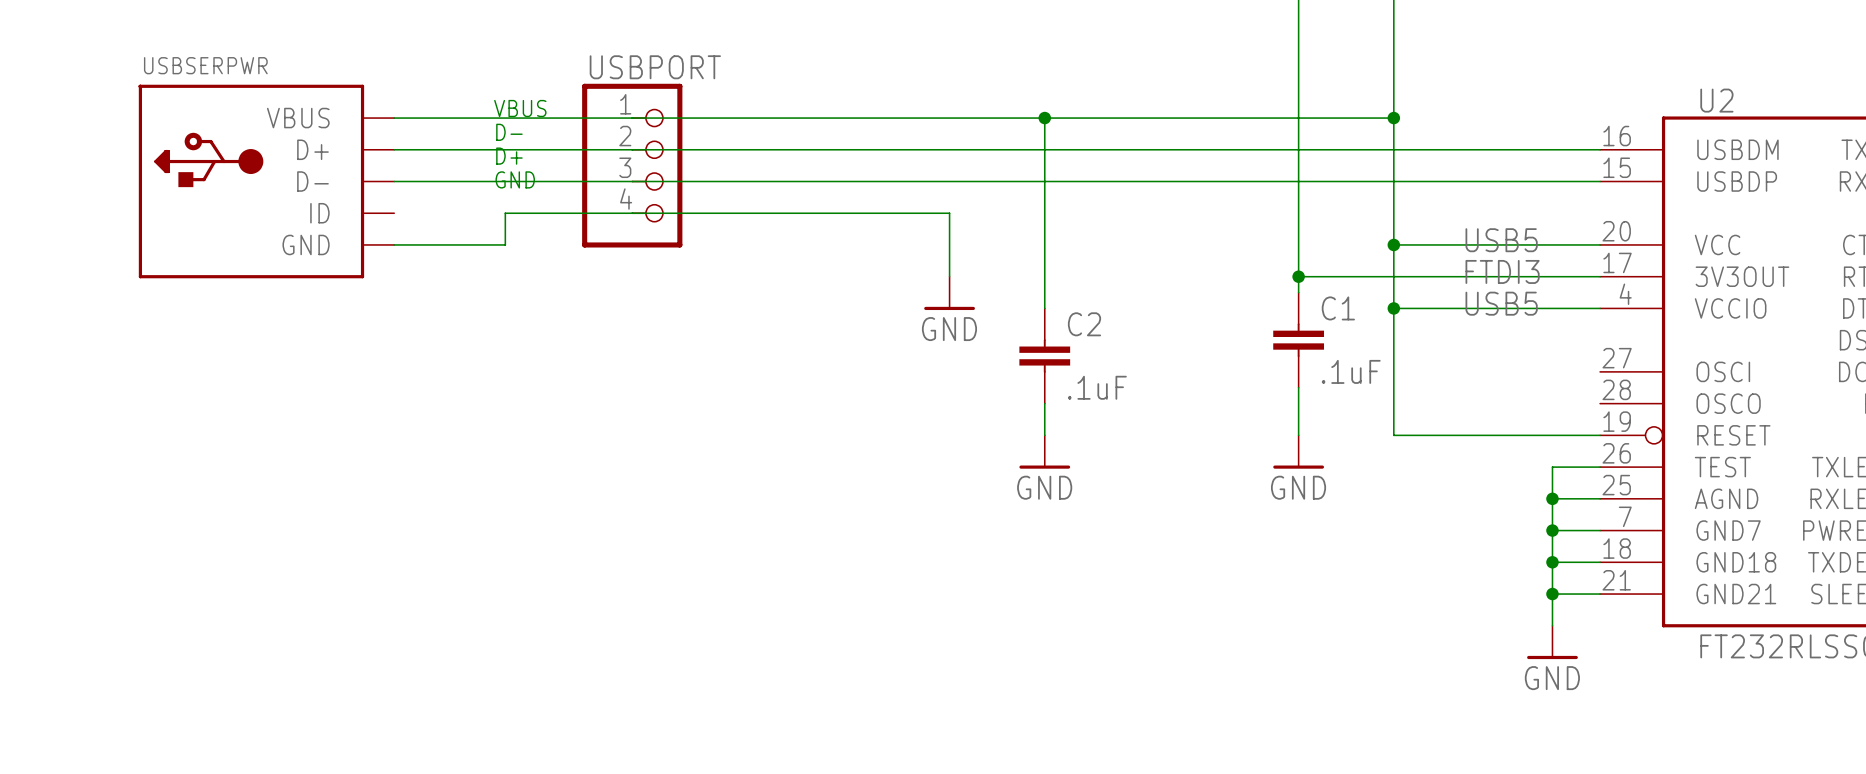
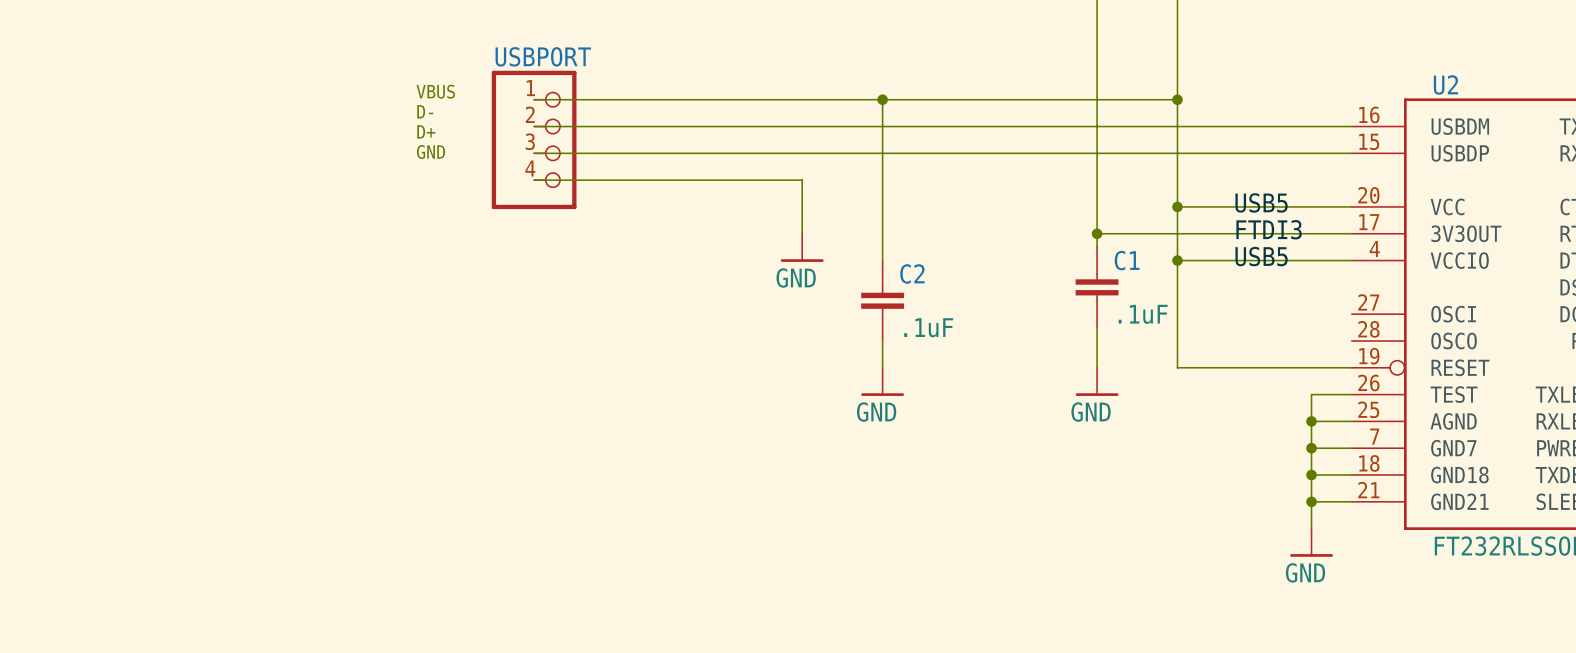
wire: (394, 118) (632, 118) -> none
wire: (394, 149) (632, 149) -> none
USBSERPWR: (266, 181) -> none
wire: (394, 181) (632, 181) -> none
wire: (632, 213) (505, 213) (505, 244) (394, 244) -> none

